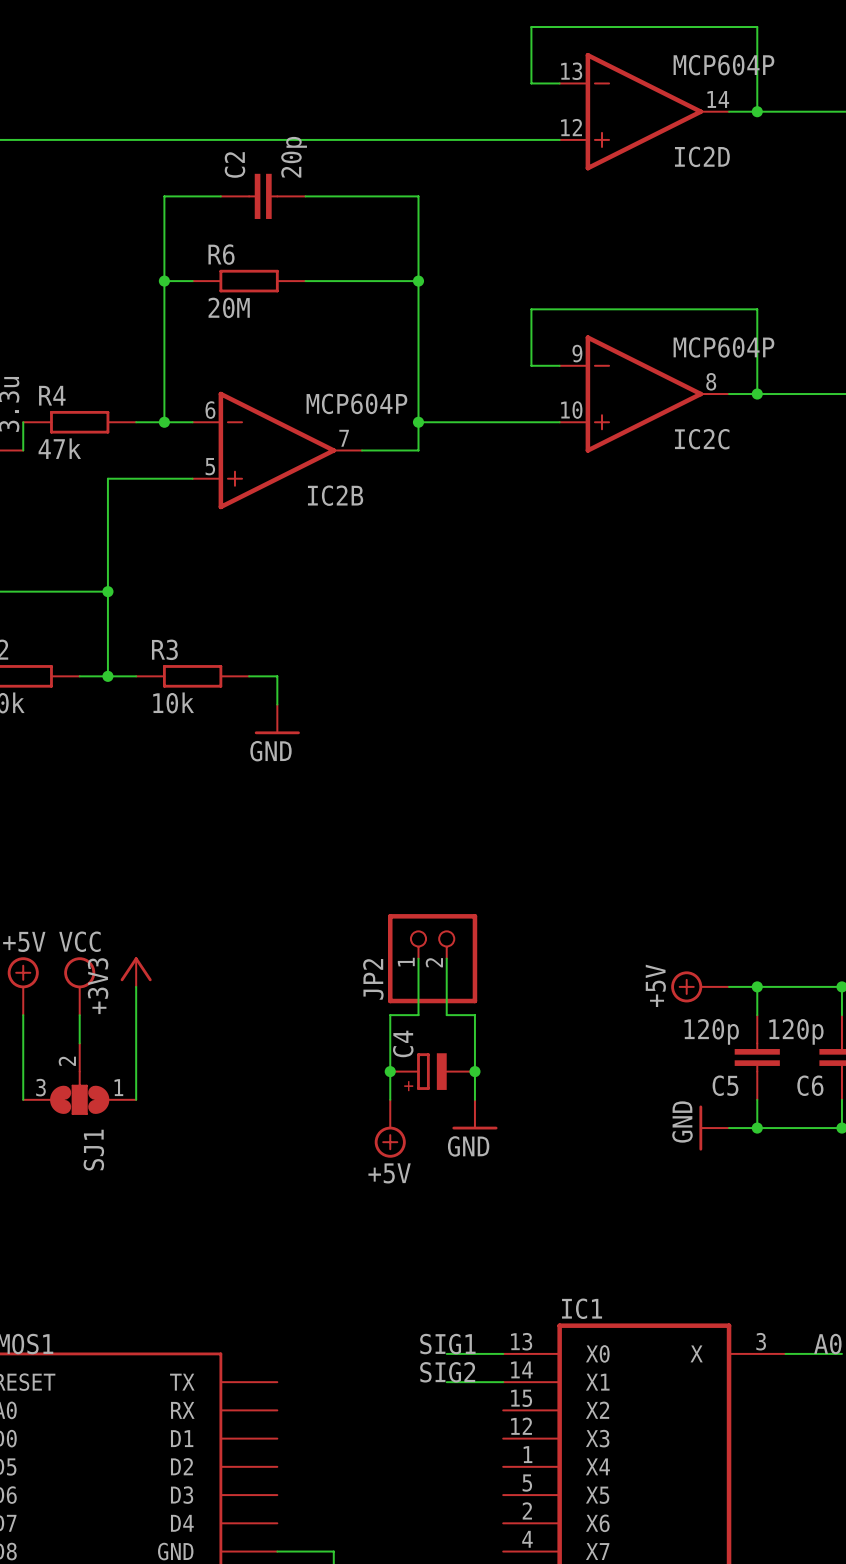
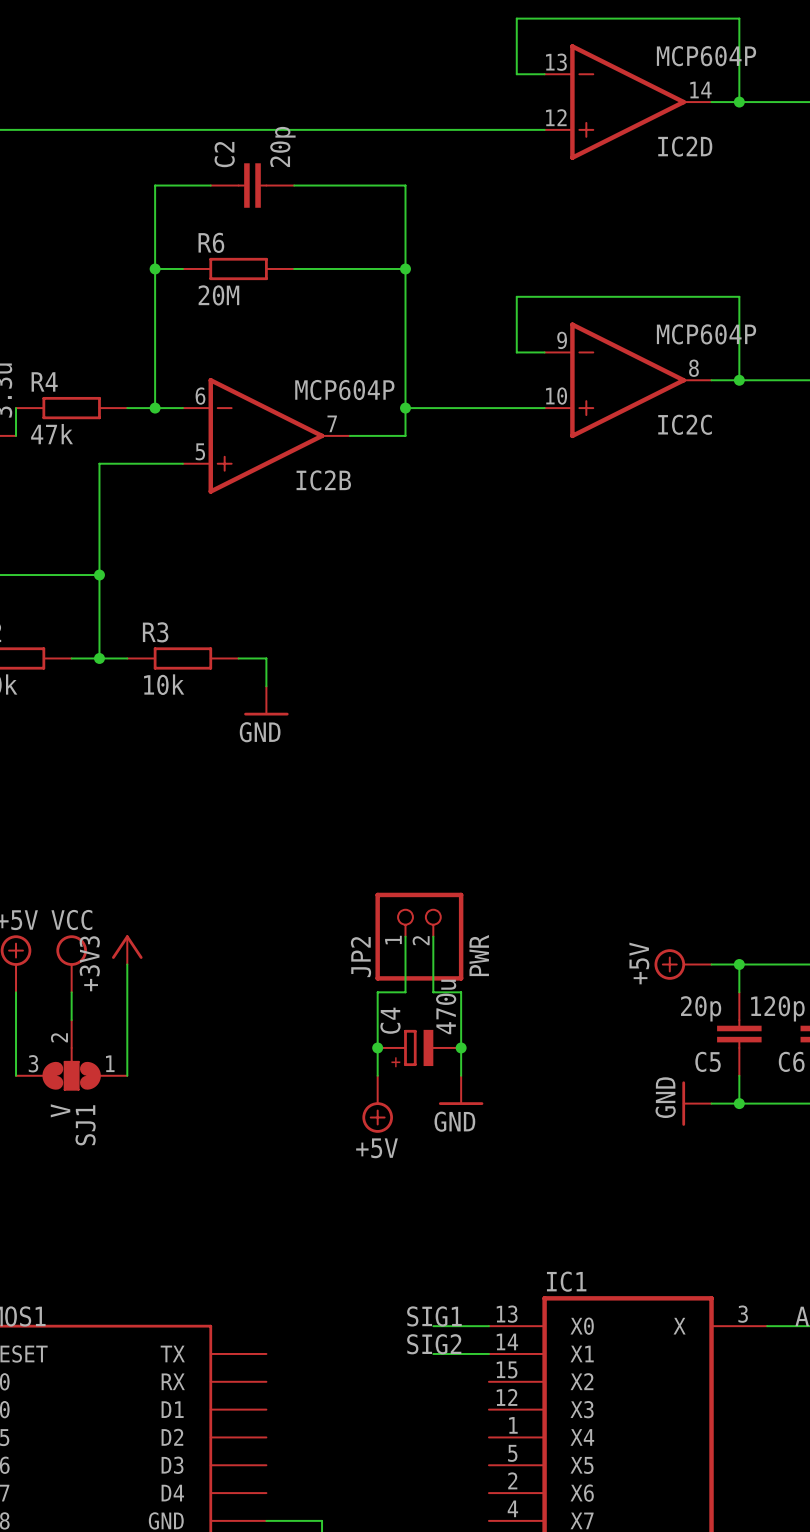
JP2 value: none -> PWR (479, 955)
C4 value: none -> 470u (446, 1006)
C5 value: 120p (711, 1031) -> 20p (701, 1008)
SJ1 value: none -> V (60, 1110)

